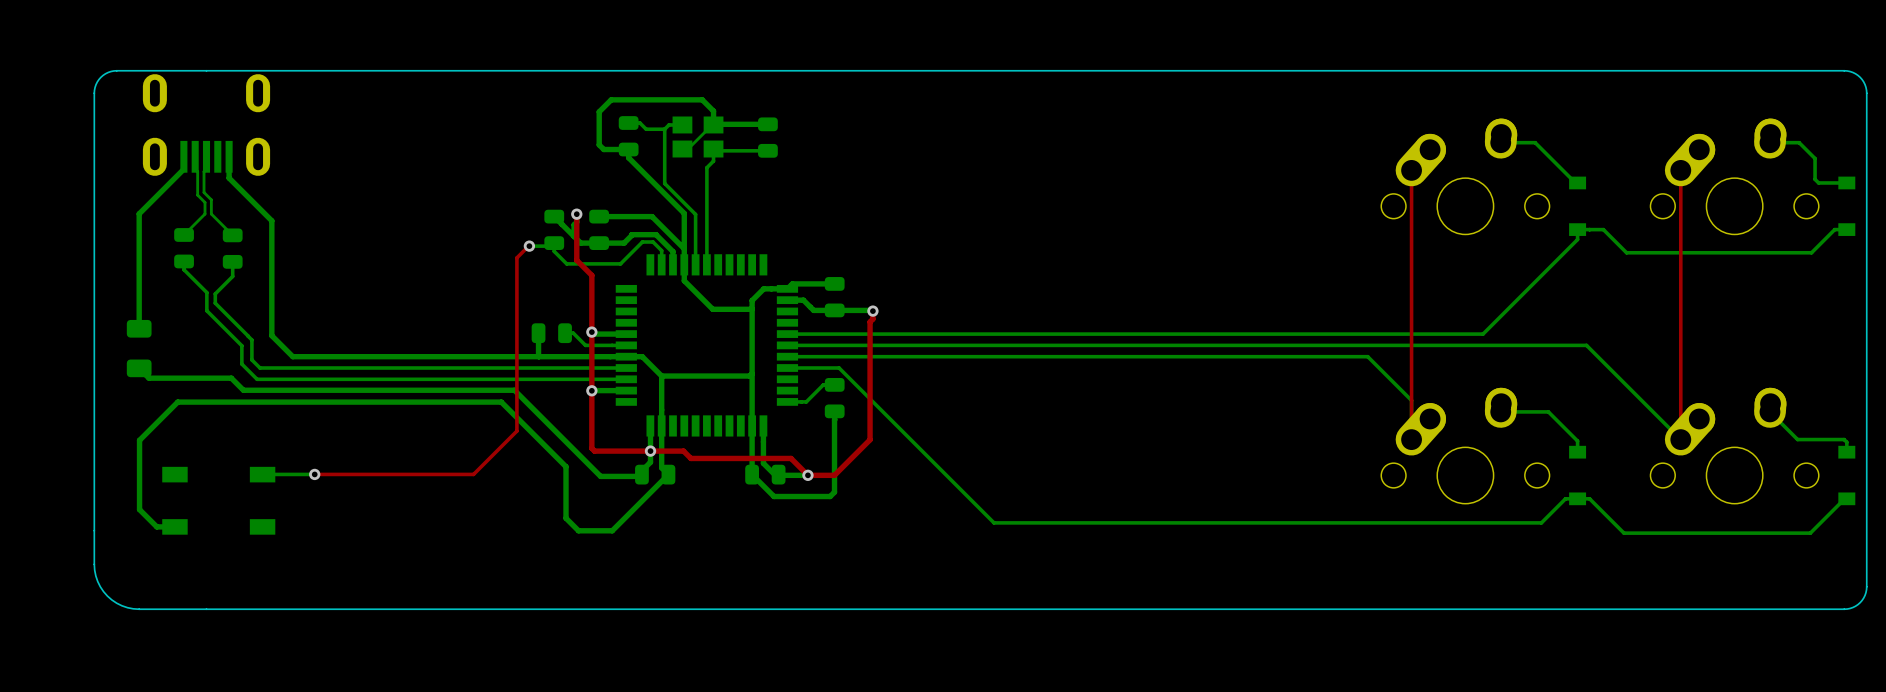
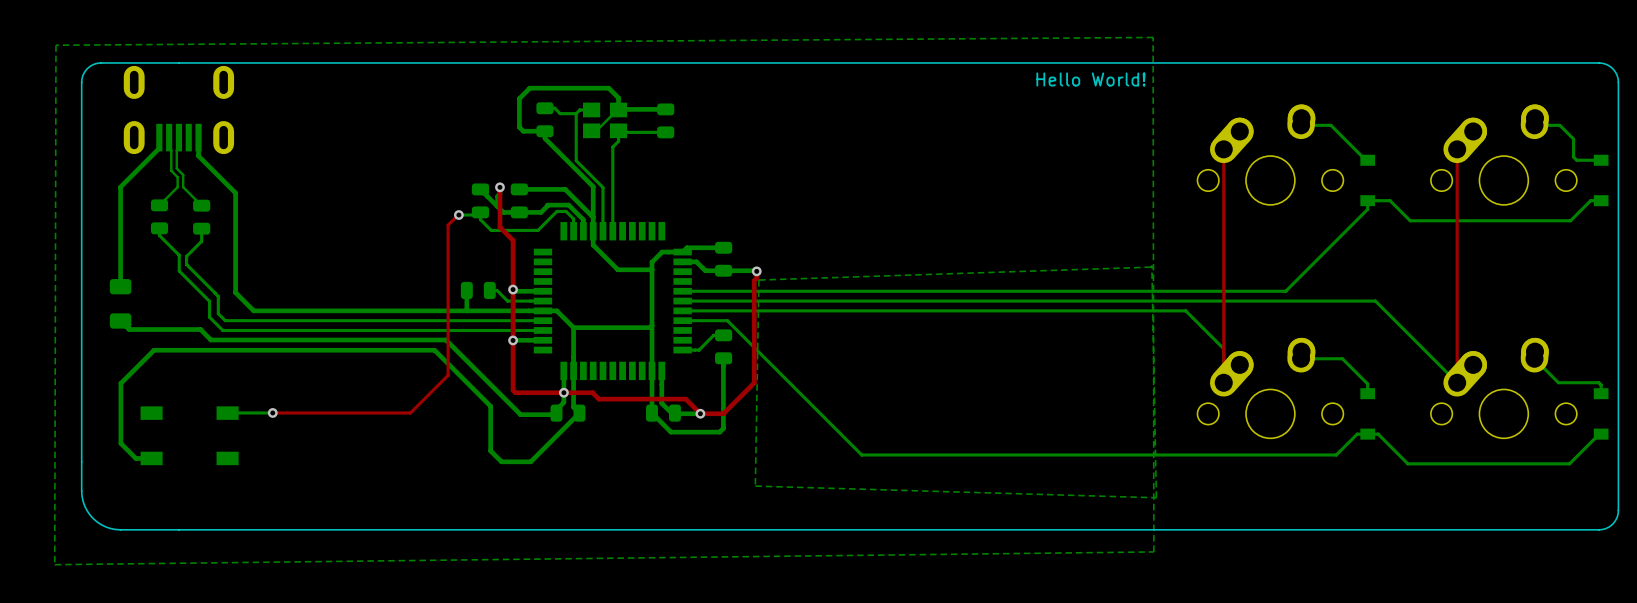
bottom zone outline: none -> (1153, 37) (1153, 551) (54, 564) (56, 45) (1153, 37)
text: none -> Hello World! (1090, 79)
bottom zone outline: none -> (1151, 265) (1156, 497) (755, 486) (758, 280) (1151, 265)

